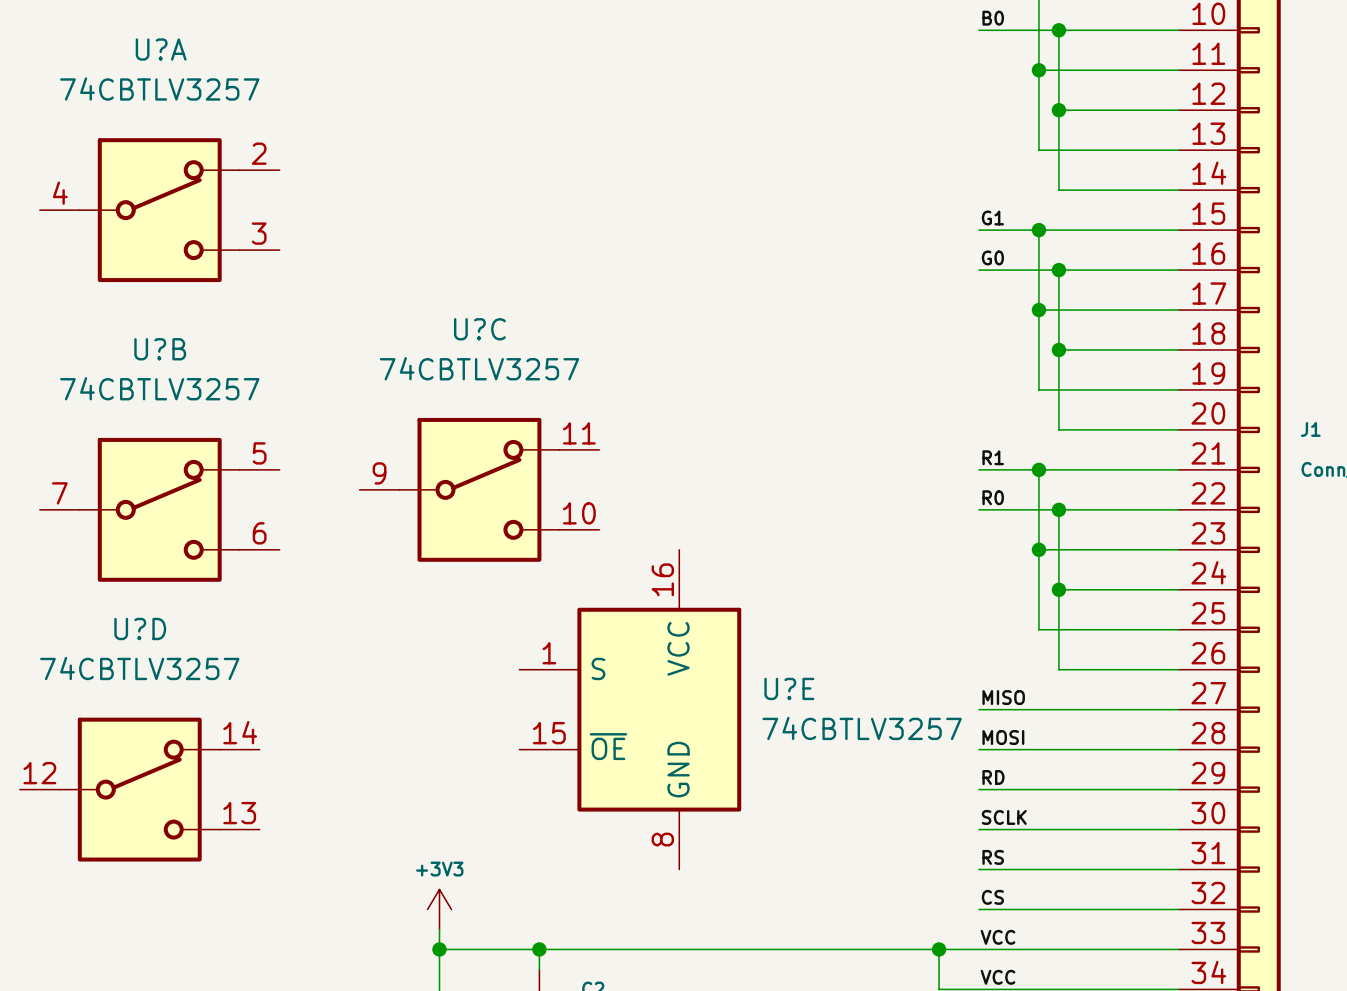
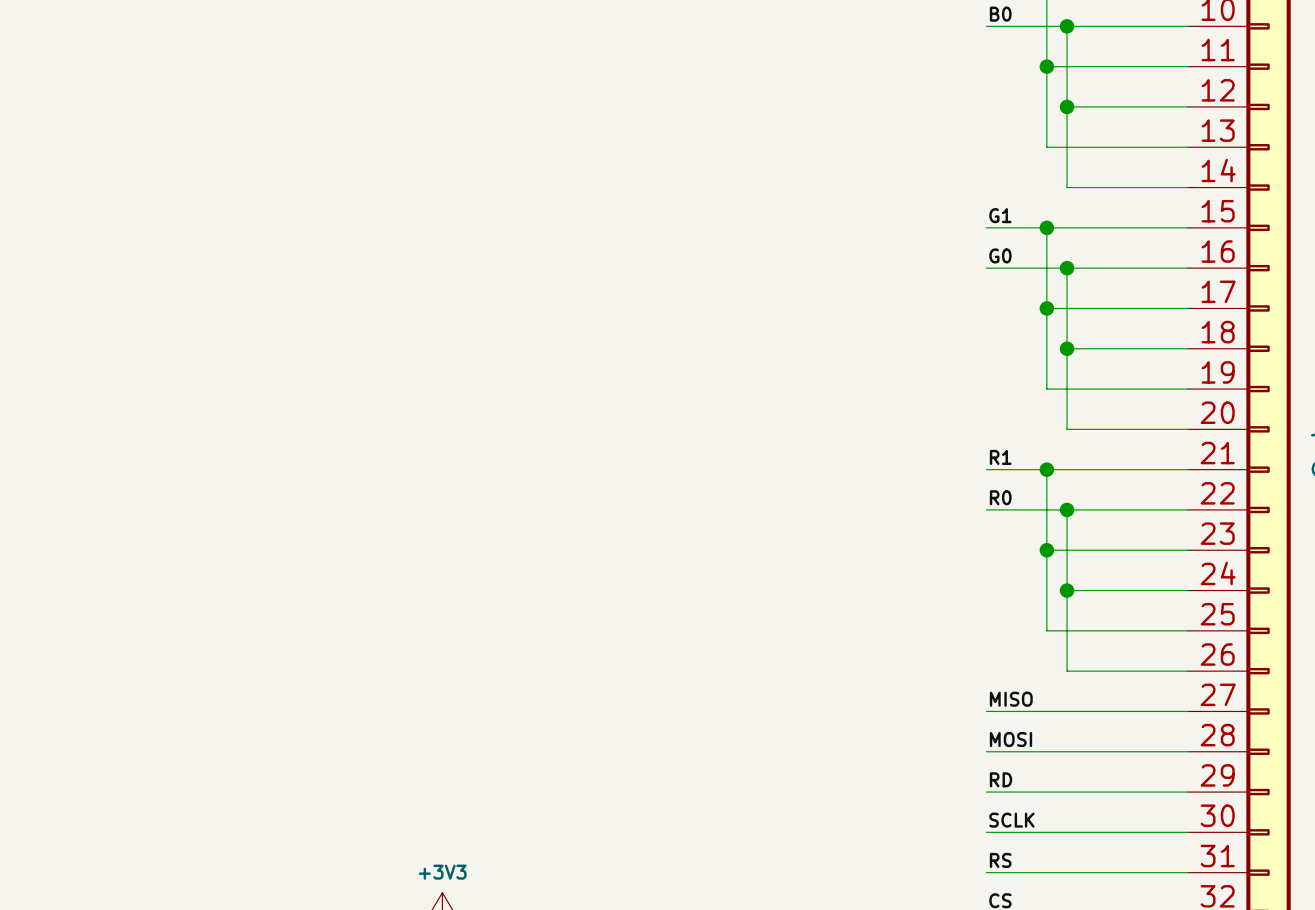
U?A: 74CBTLV3257 (159, 210) -> none
U?C: 74CBTLV3257 (479, 489) -> none
U?B: 74CBTLV3257 (159, 509) -> none
U?E: 74CBTLV3257 (630, 709) -> none
U?D: 74CBTLV3257 (139, 789) -> none

